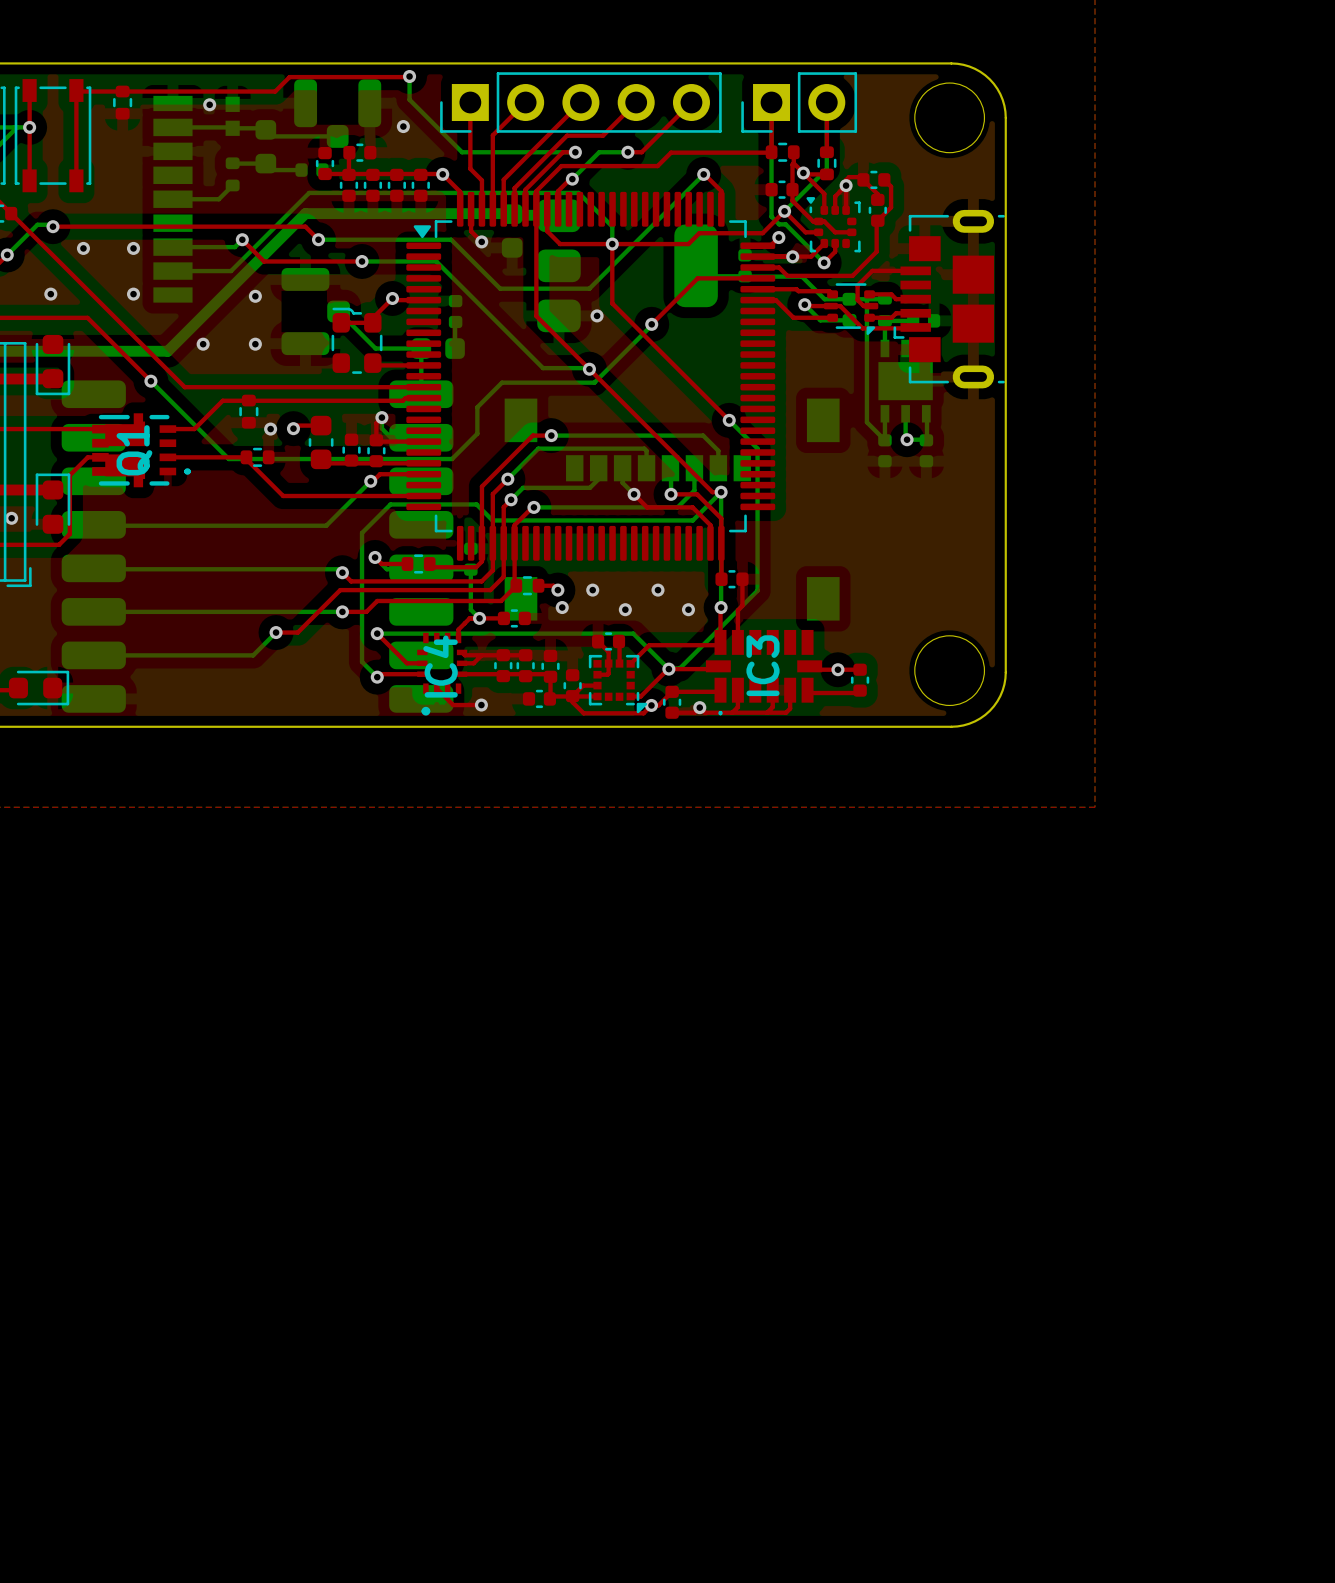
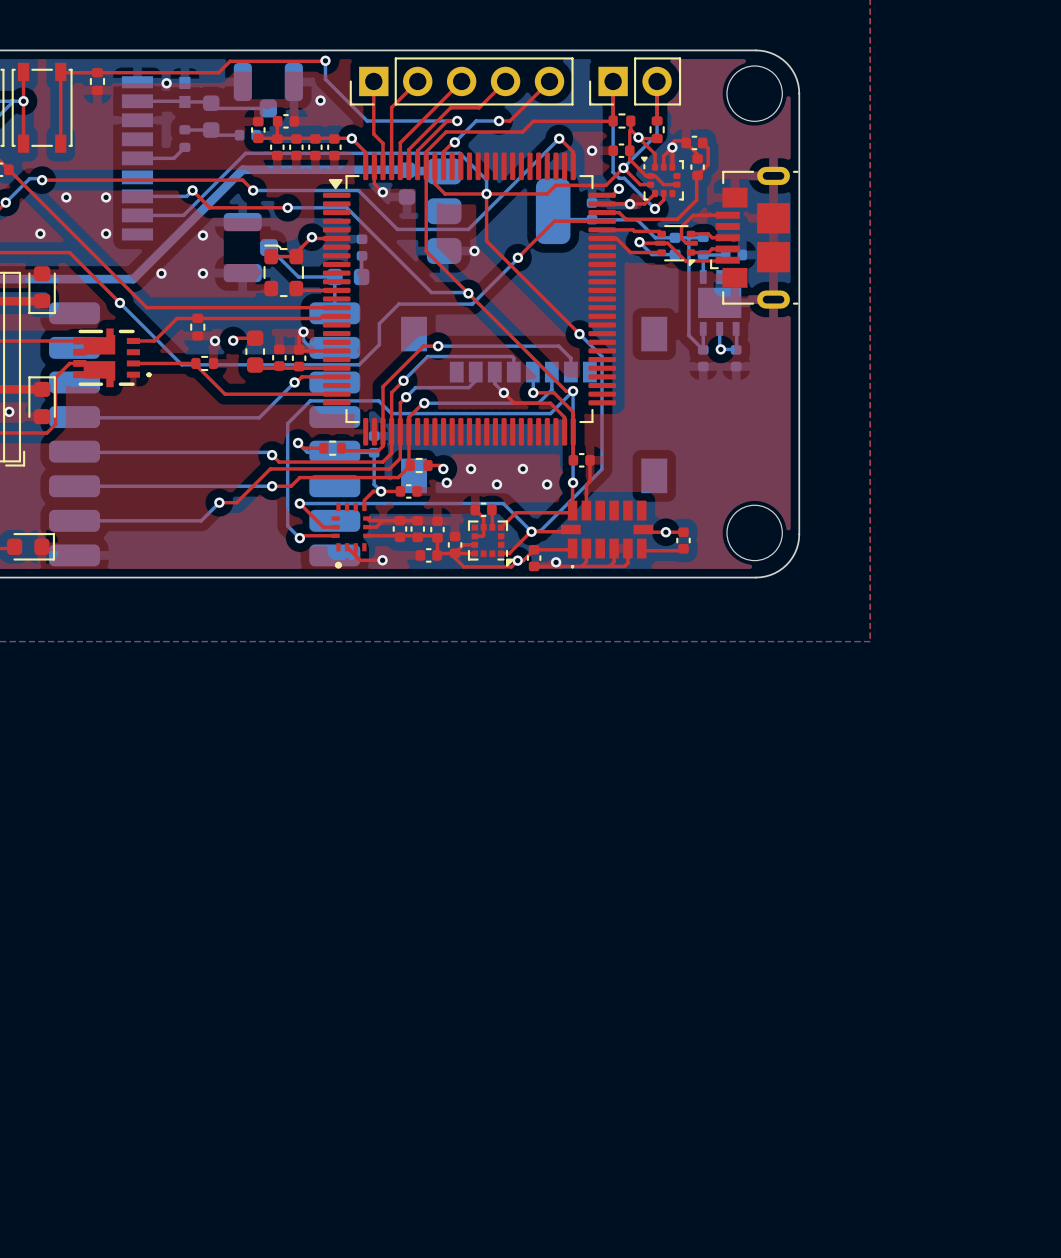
via: none -> (592, 150)
Q1 name: Q1 (134, 450) -> none
IC3 name: IC3 (763, 665) -> none
IC4 name: IC4 (440, 666) -> none

